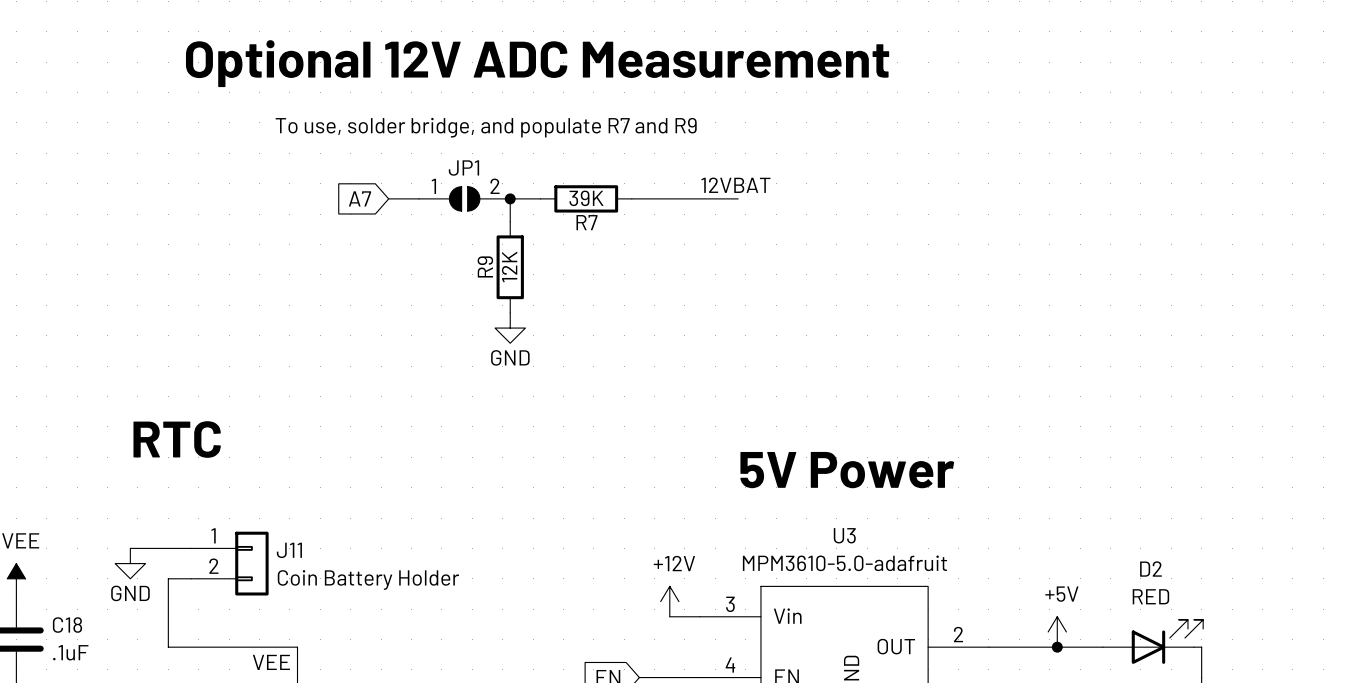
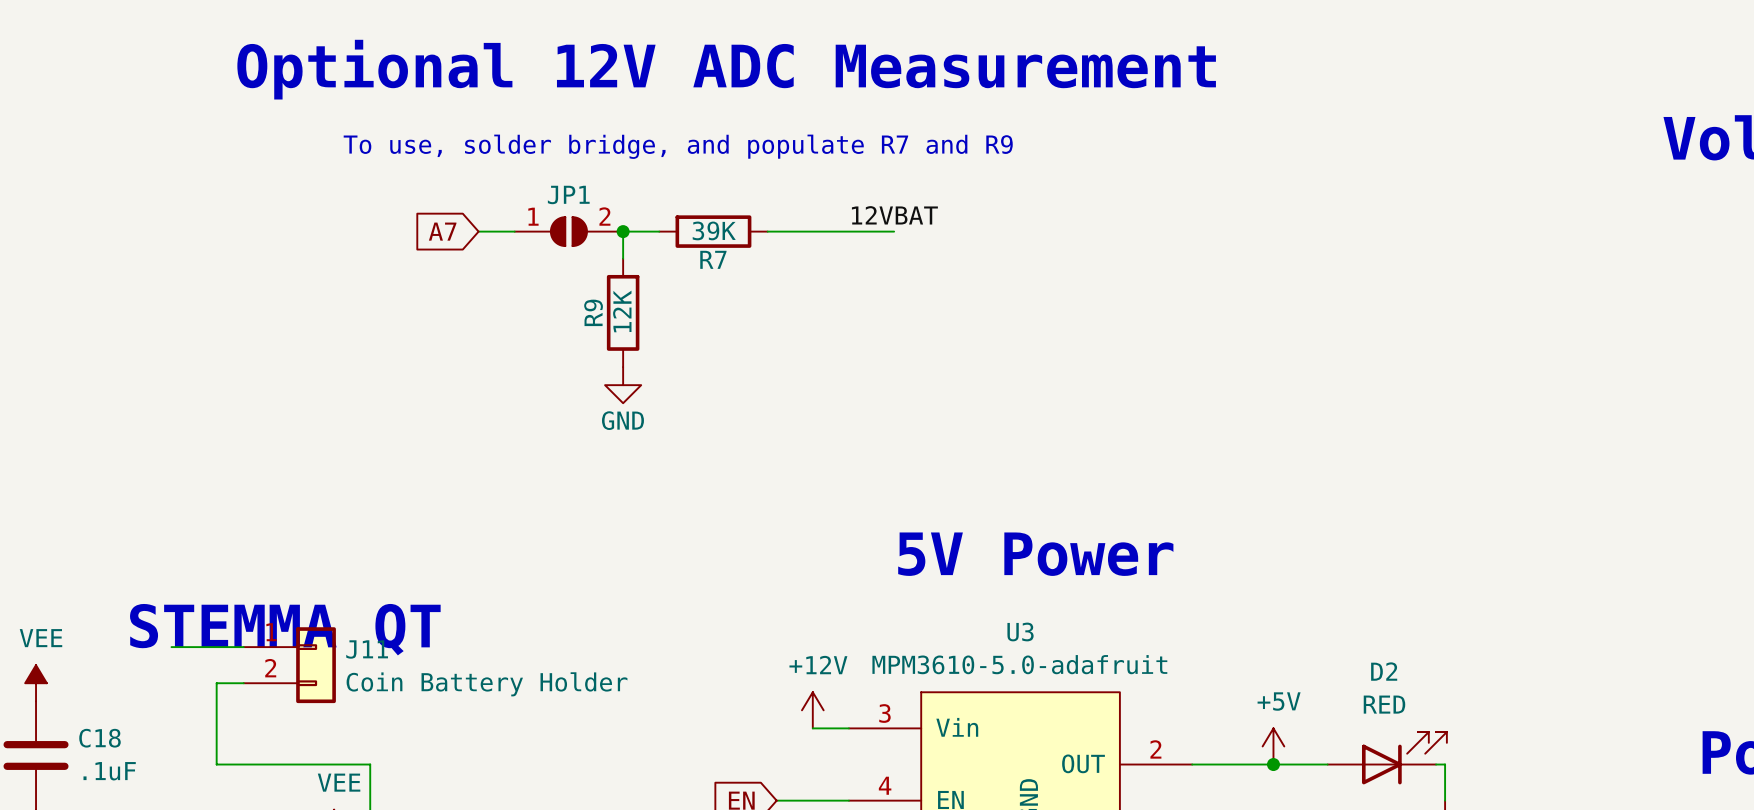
text: RTC (177, 439) -> none
text: none -> STEMMA QT (285, 629)
power symbol: GND (130, 563) -> none

